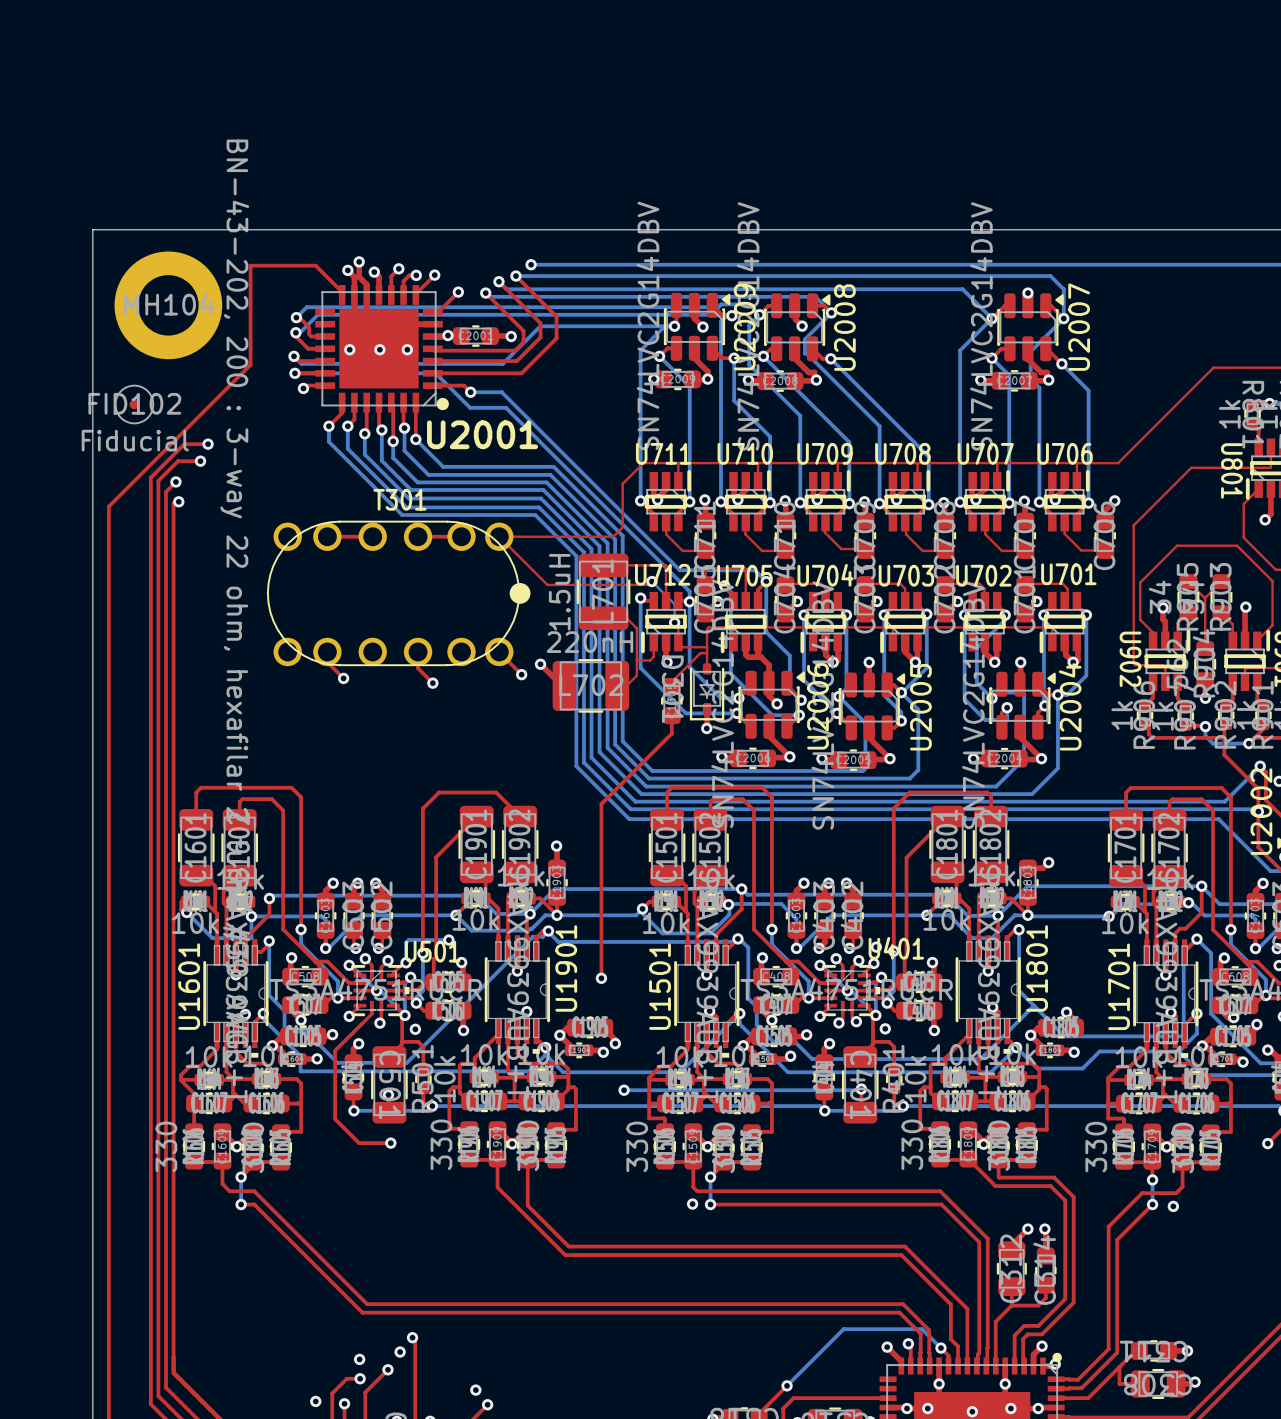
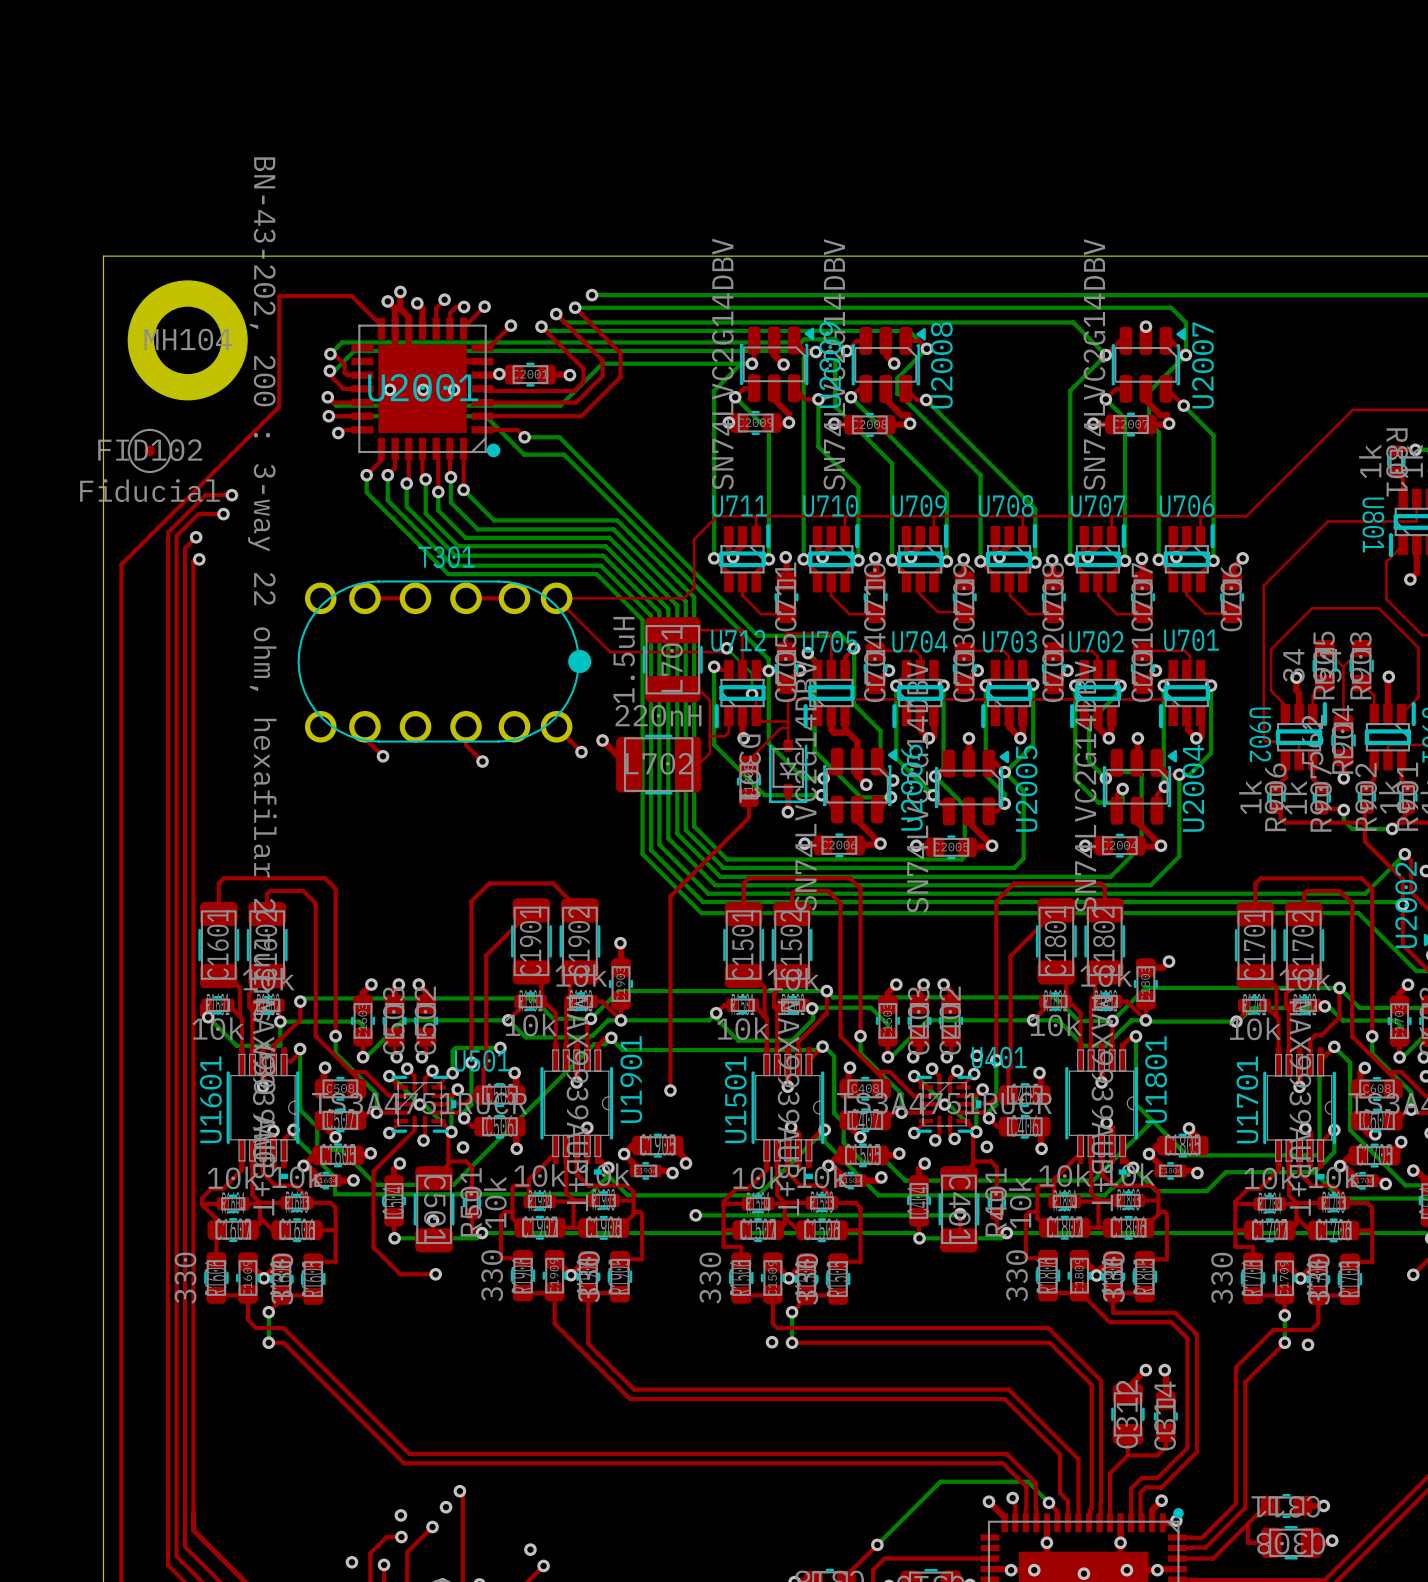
U2001 name position: U2001 (482, 434) -> U2001 (423, 387)

